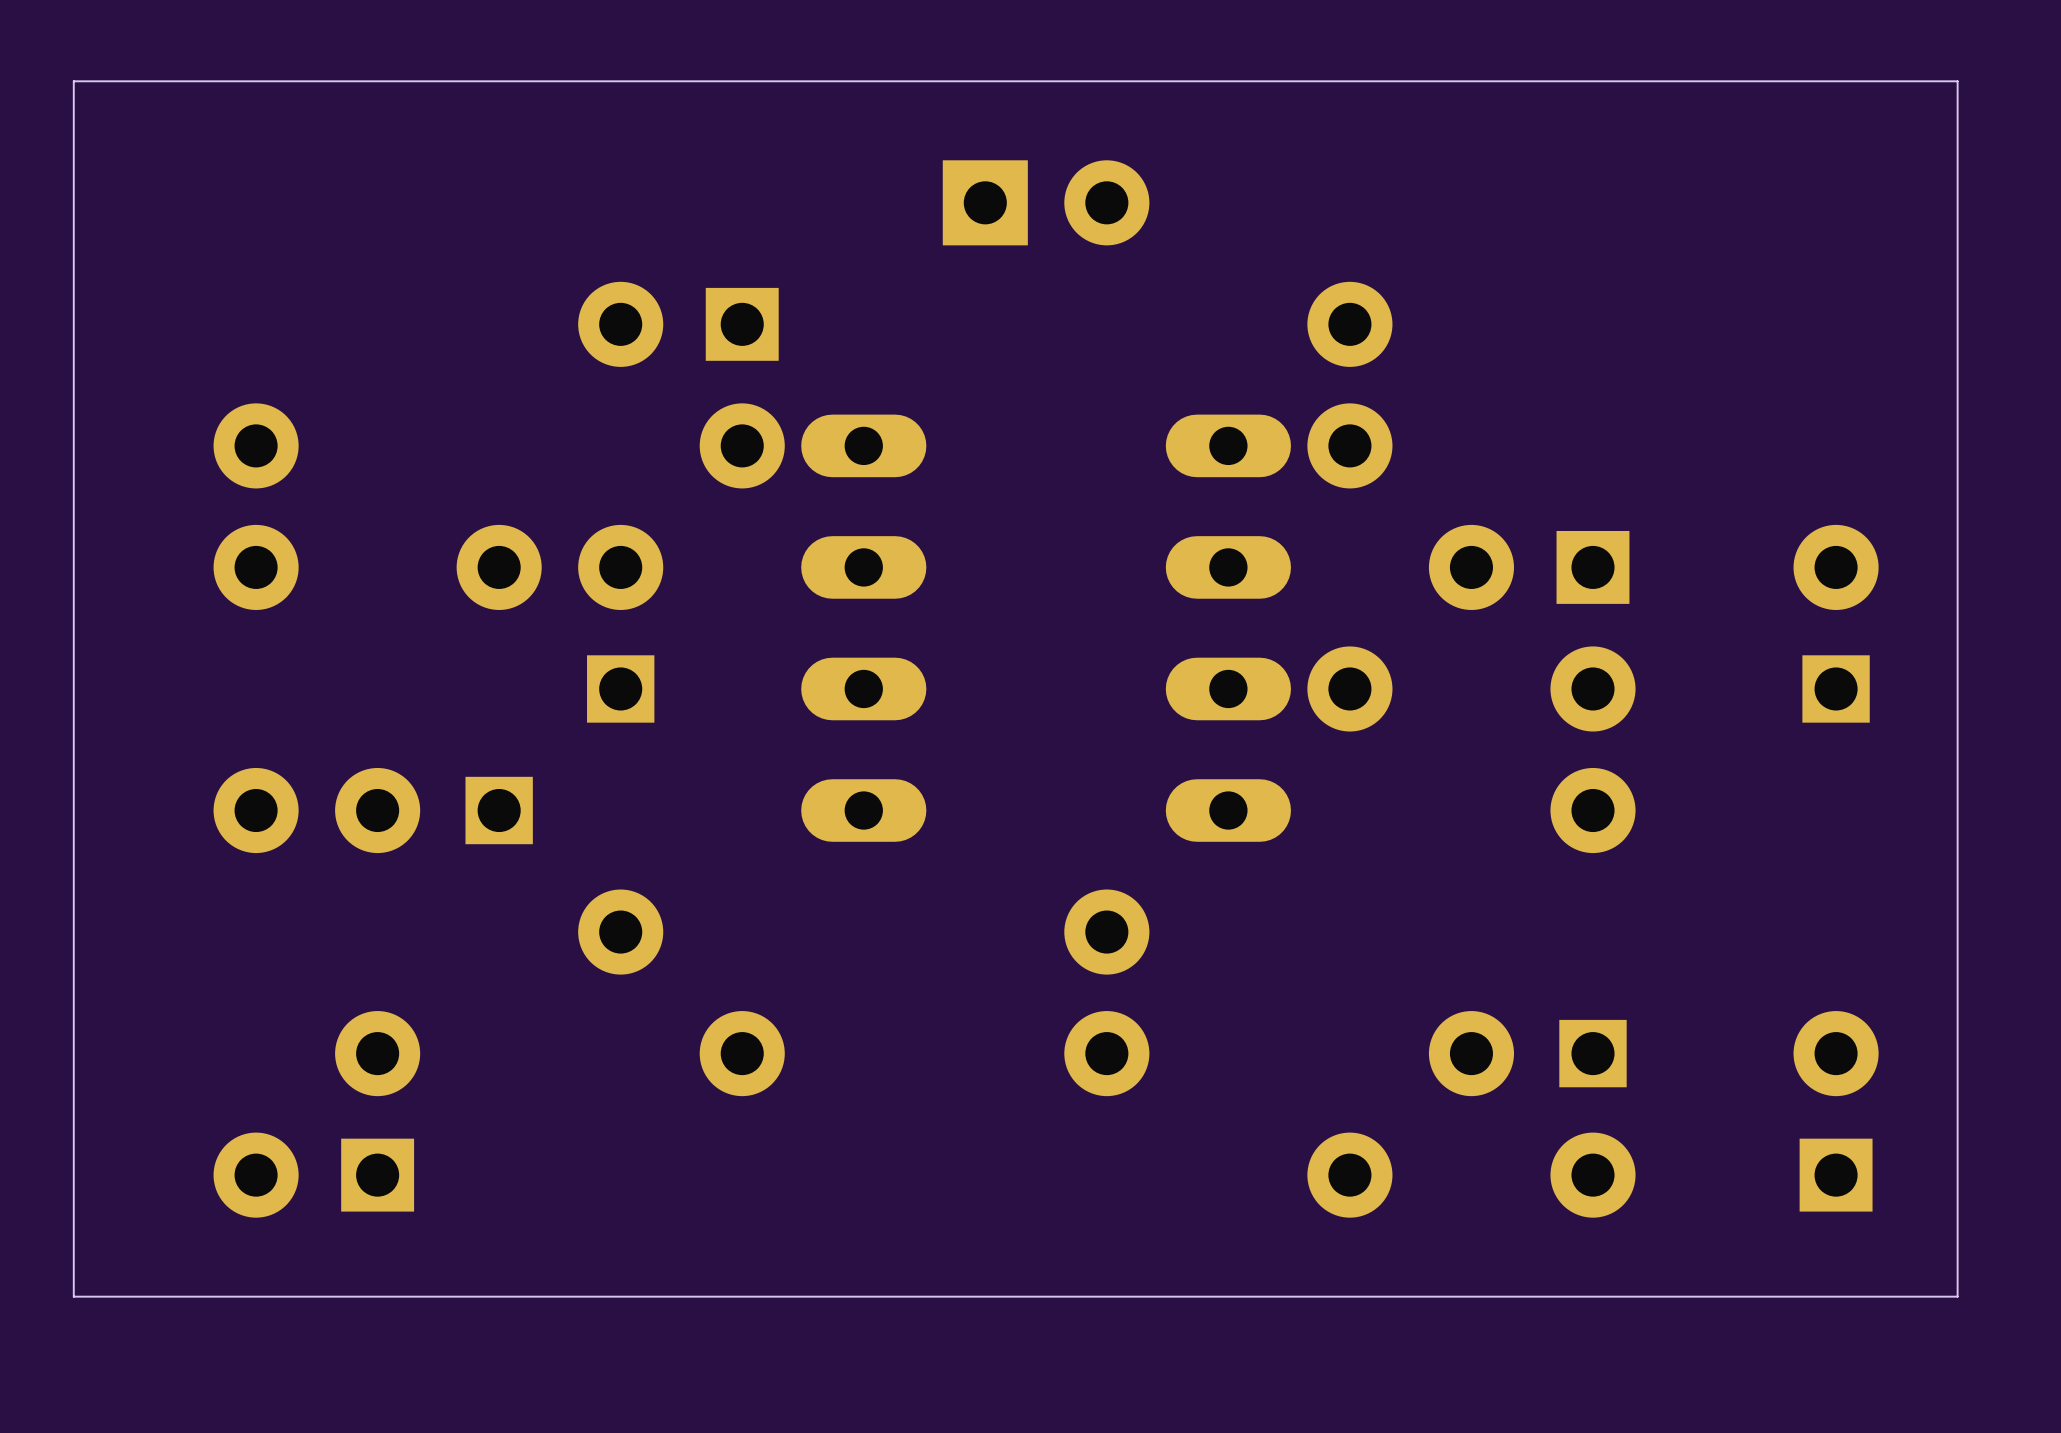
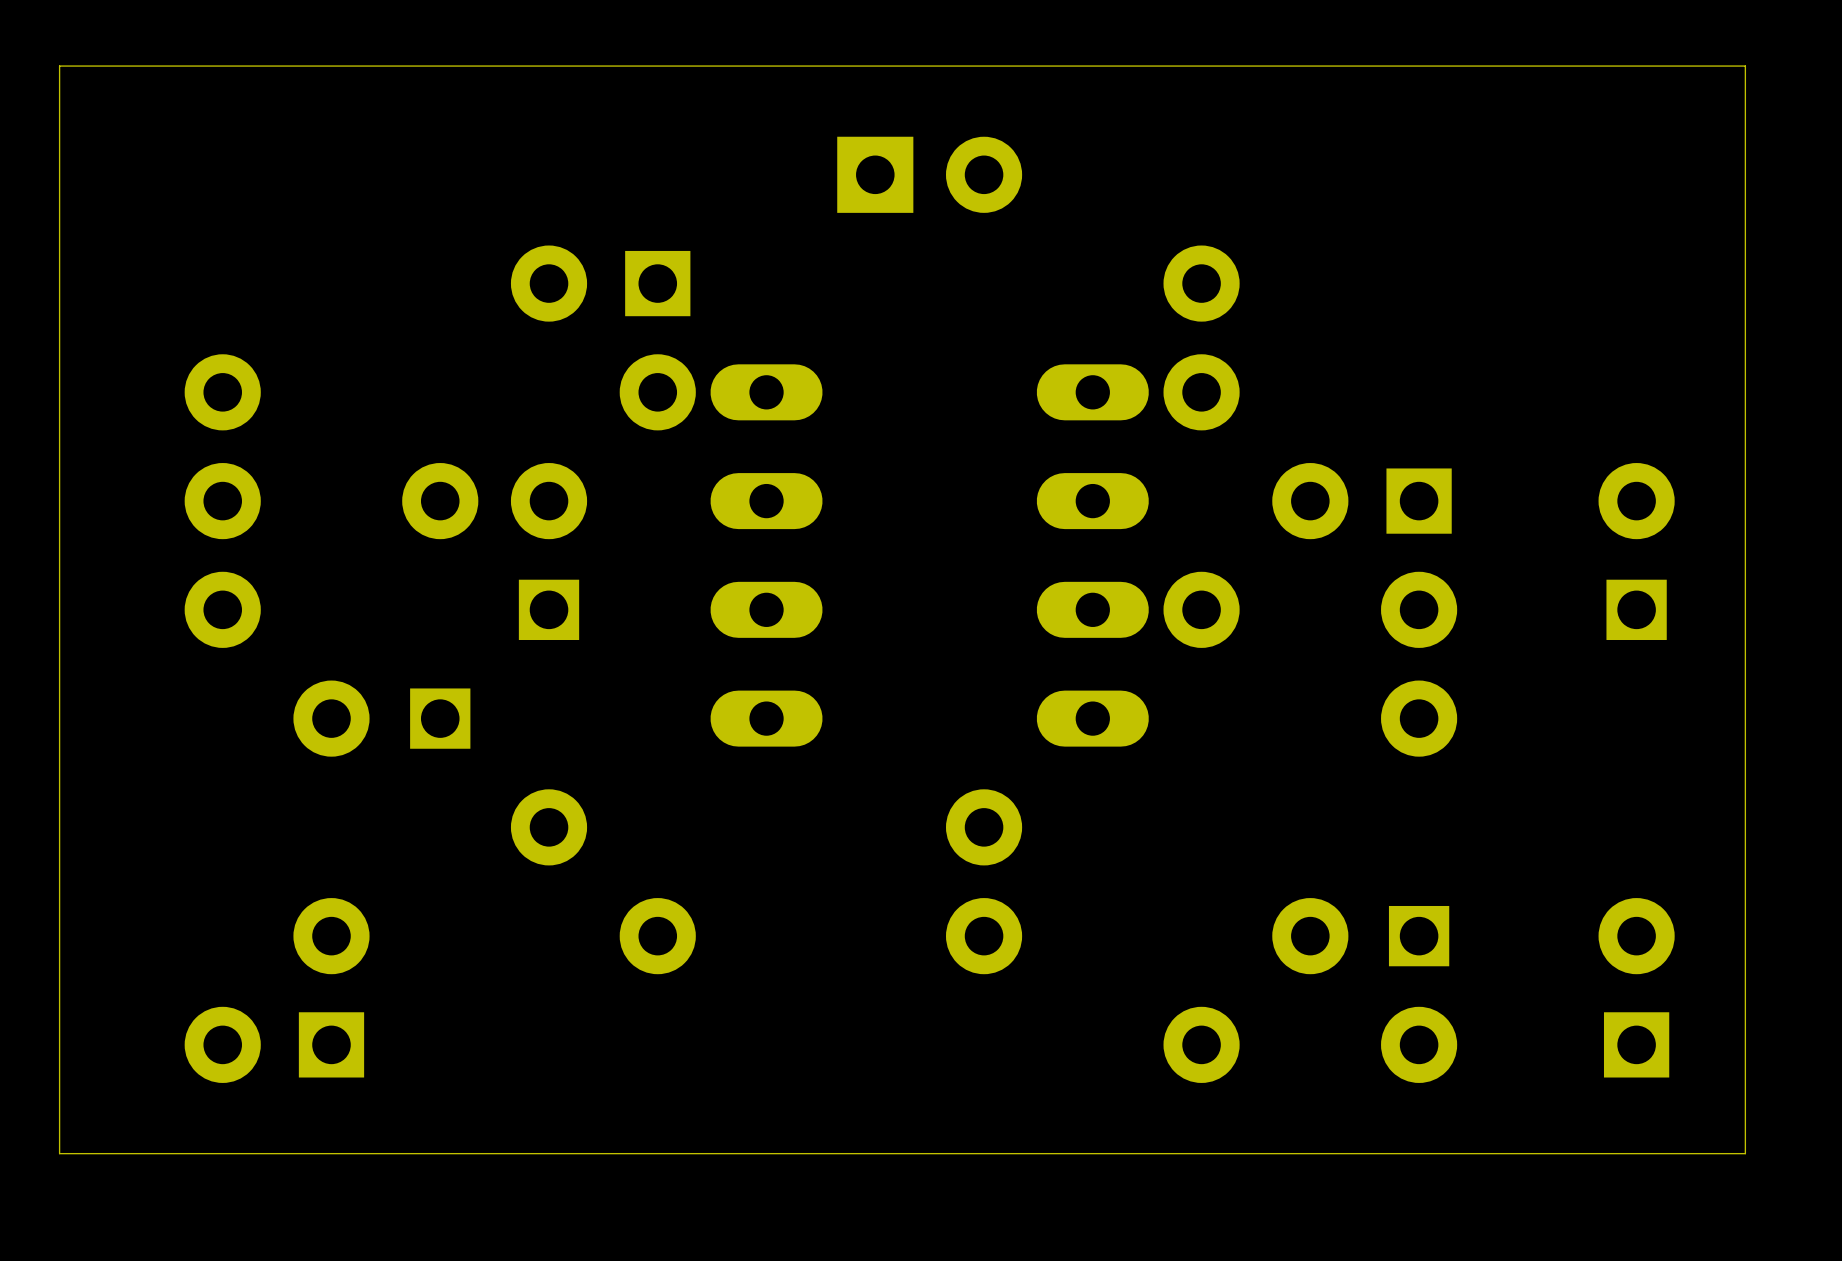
part position: (256, 810) -> (222, 609)

